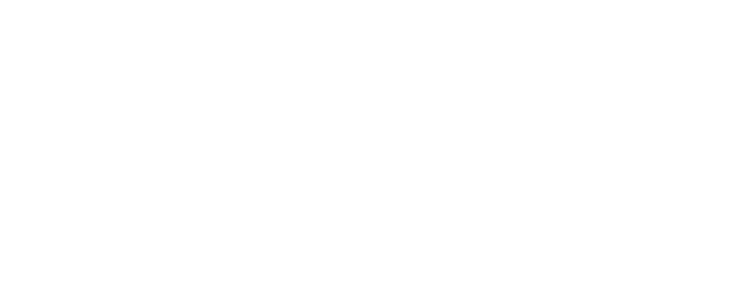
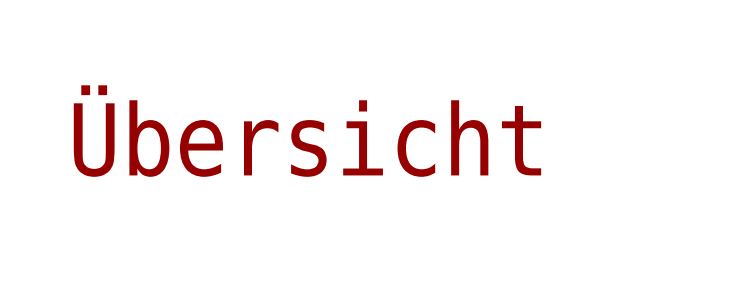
text: none -> Übersicht (307, 131)

